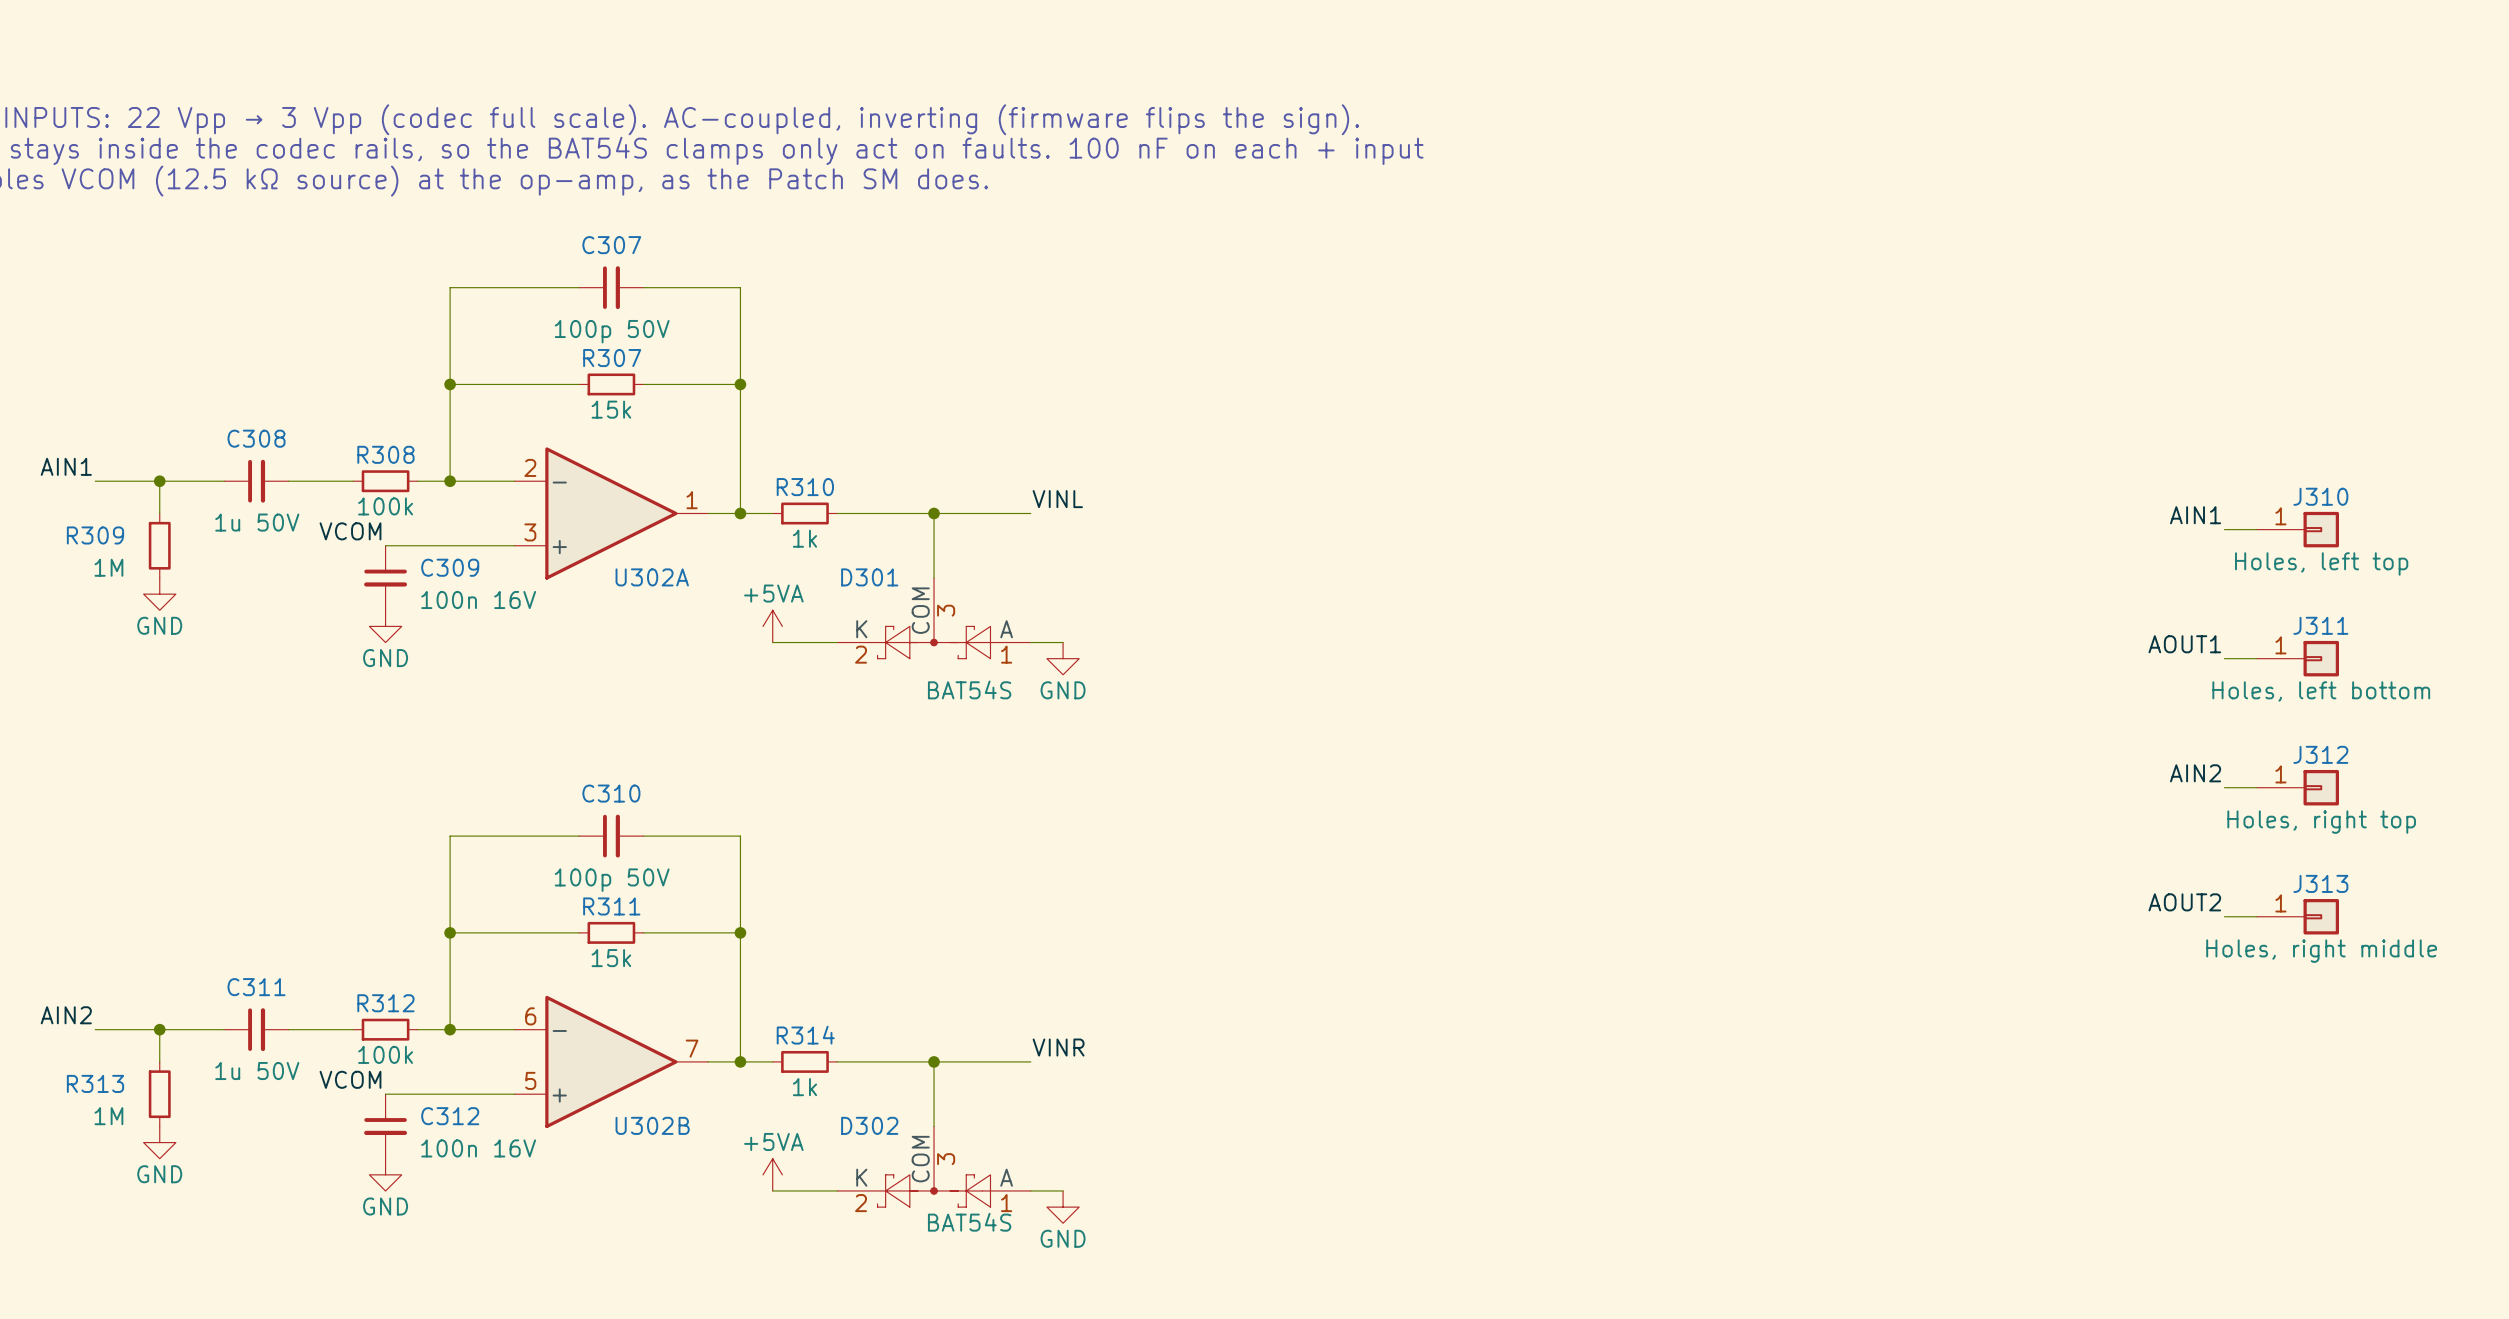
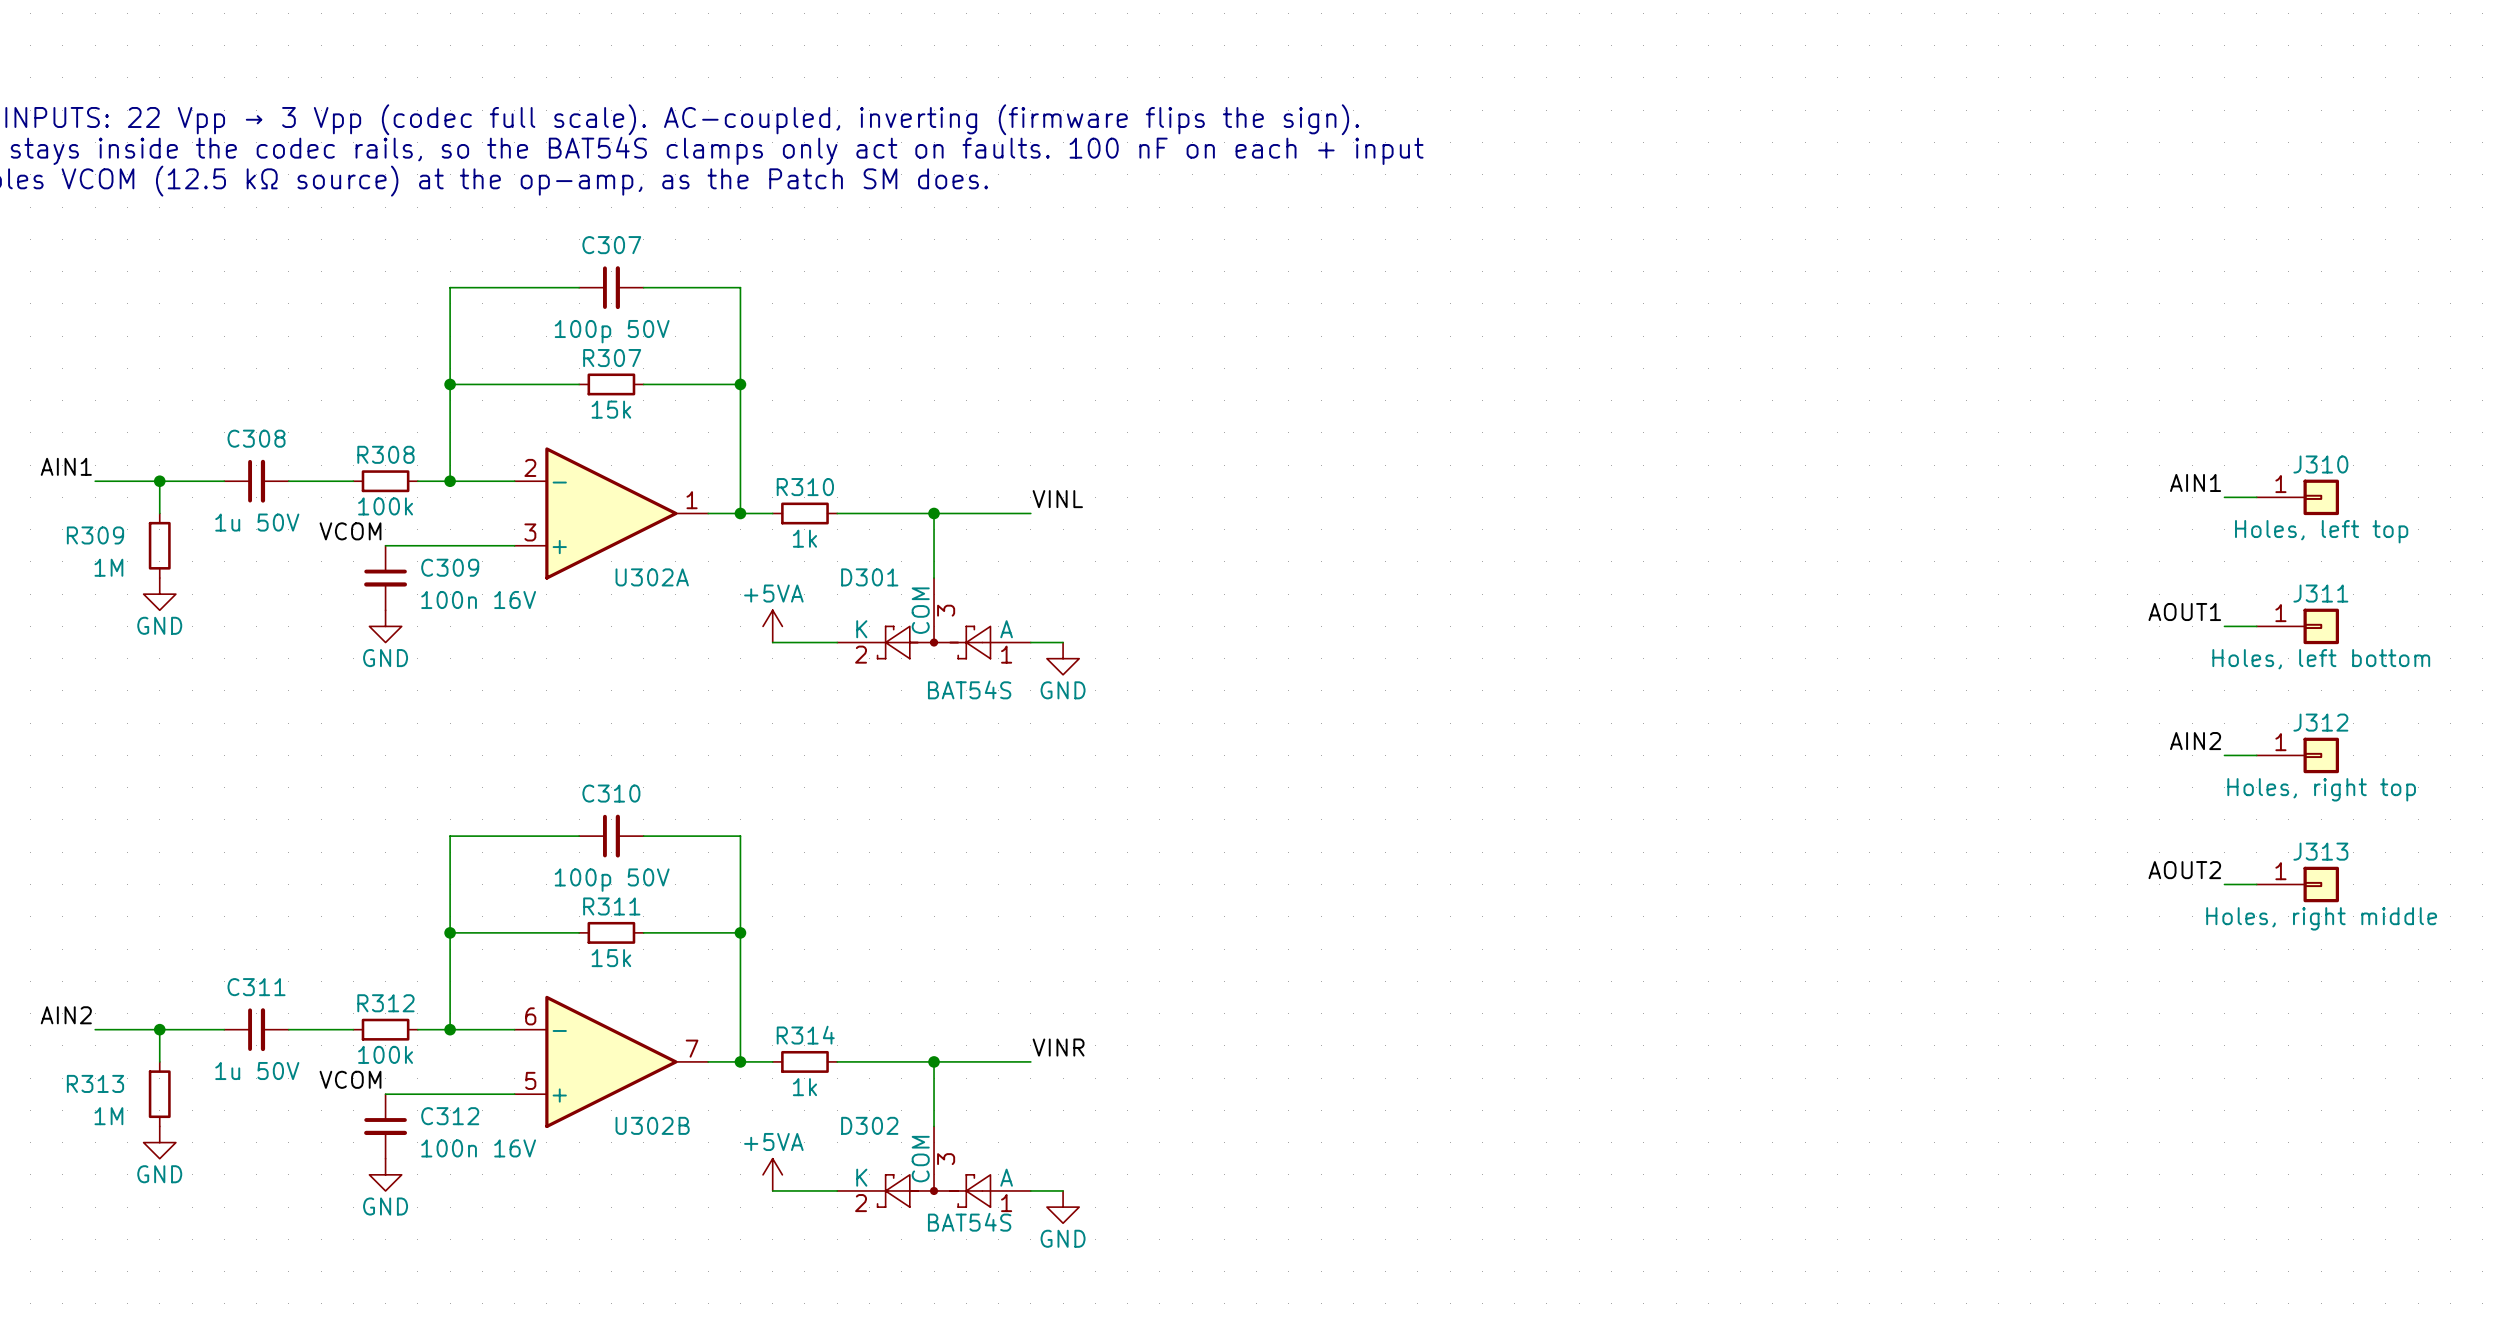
label position: AIN1 (2195, 515) -> AIN1 (2195, 482)
wire: (2224, 529) (2256, 529) -> (2224, 497) (2256, 497)
J310 position: (2297, 529) -> (2297, 497)
label position: AOUT1 (2184, 644) -> AOUT1 (2184, 612)
wire: (2224, 658) (2256, 658) -> (2224, 626) (2256, 626)
J311 position: (2297, 658) -> (2297, 626)
label position: AIN2 (2195, 773) -> AIN2 (2195, 741)
wire: (2224, 787) (2256, 787) -> (2224, 755) (2256, 755)
J312 position: (2297, 787) -> (2297, 755)
label position: AOUT2 (2184, 902) -> AOUT2 (2184, 870)
wire: (2224, 916) (2256, 916) -> (2224, 884) (2256, 884)
J313 position: (2297, 916) -> (2297, 884)

